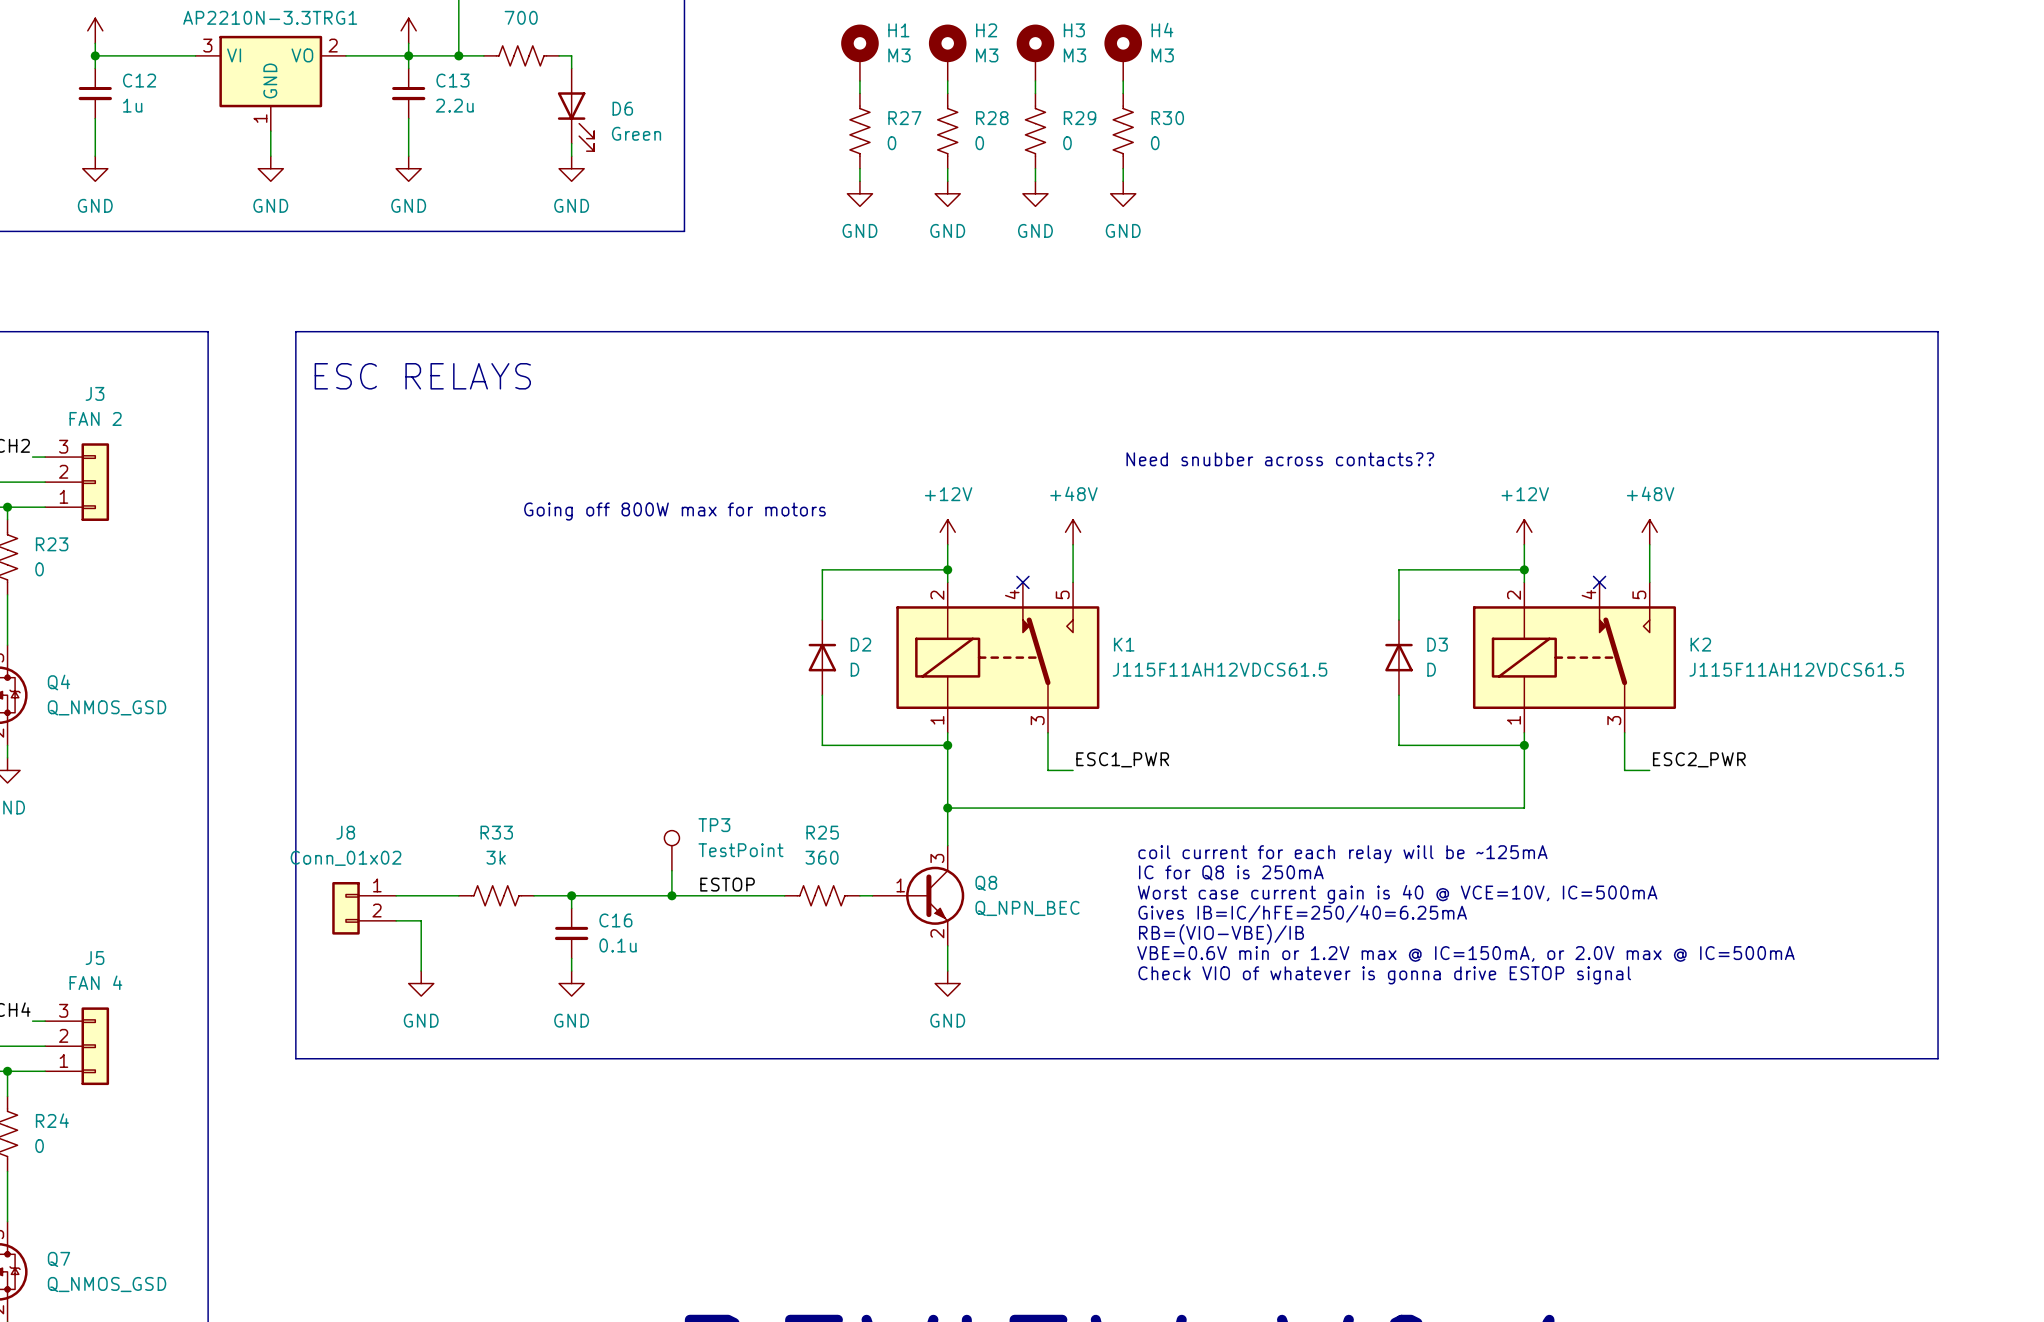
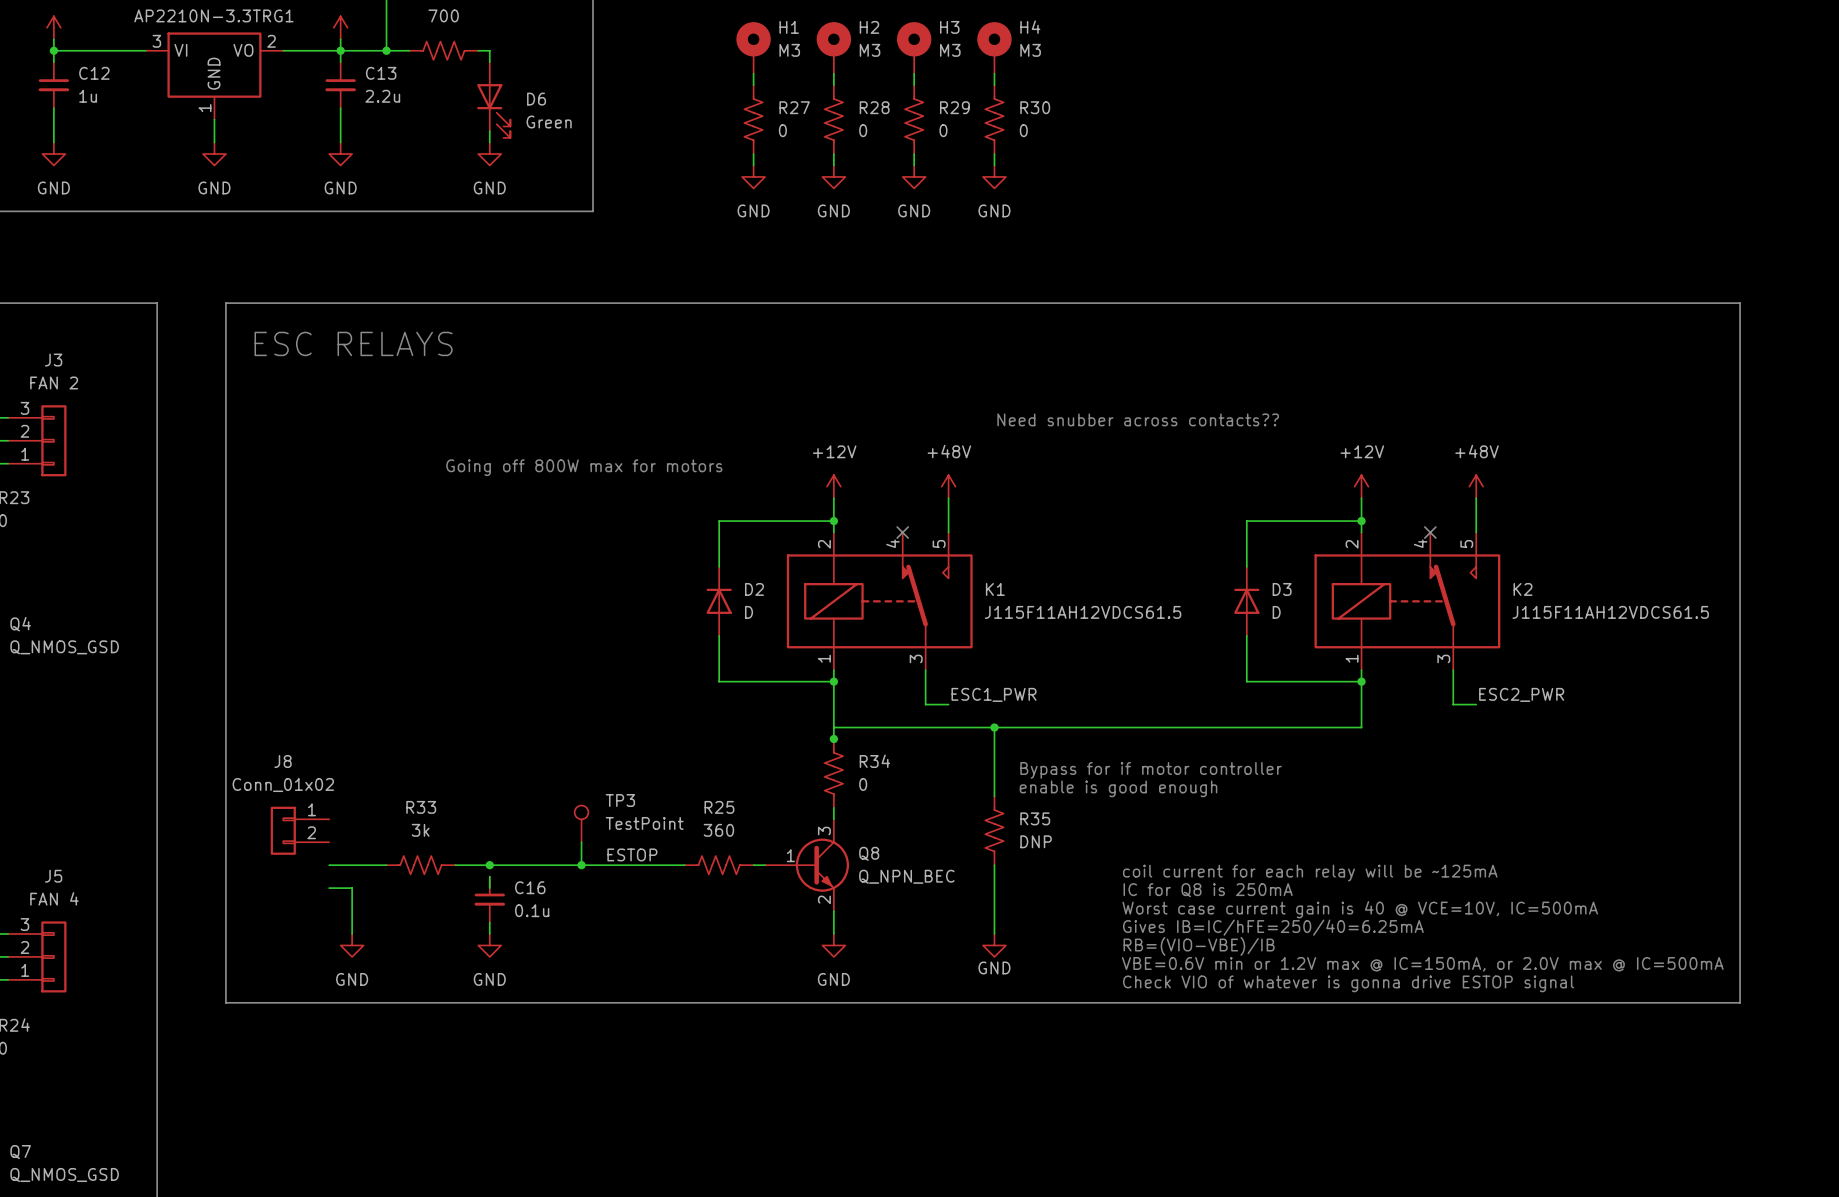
line: (295, 331) (295, 1058) (1938, 1058) -> (237, 303) (225, 303) (225, 1002) (1740, 1002) (1740, 968)
wire: none -> (994, 727) (994, 796)
junction: none -> (994, 727)
wire: (1524, 795) (1524, 808) (947, 808) (947, 845) -> (1361, 727) (833, 727)
text: none -> Bypass for if motor controller (1151, 770)
R34: none -> 0 (833, 773)
TP3 position: (671, 850) -> (581, 823)
text position: coil current for each relay will be ~125mA (1342, 854) -> coil current for each relay will be ~125mA (1310, 873)
text: none -> enable is good enough (1118, 788)
wire: (671, 870) (671, 895) -> (581, 842) (581, 865)
text position: IC for Q8 is 250mA (1231, 872) -> IC for Q8 is 250mA (1208, 890)
wire: none -> (833, 807) (833, 819)
label position: ESTOP (727, 884) -> ESTOP (632, 854)
text position: Worst case current gain is 40 @ VCE=10V, IC=500mA (1397, 894) -> Worst case current gain is 40 @ VCE=10V, IC=500mA (1360, 909)
wire: (396, 895) (458, 895) -> (329, 865) (386, 865)
R33 position: (496, 895) -> (420, 865)
wire: (534, 895) (784, 895) -> (455, 865) (684, 865)
wire: (571, 895) (571, 908) -> (489, 922) (489, 934)
junction position: (571, 895) -> (489, 865)
junction position: (671, 895) -> (581, 865)
R25 position: (822, 895) -> (719, 865)
wire: (859, 895) (872, 895) -> (753, 865) (765, 865)
Q8 position: (918, 895) -> (807, 865)
R35: none -> DNP (994, 830)
text position: Gives IB=IC/hFE=250/40=6.25mA (1302, 913) -> Gives IB=IC/hFE=250/40=6.25mA (1273, 927)
wire: (396, 920) (421, 920) (421, 971) -> (329, 888) (352, 888) (352, 934)
C16 position: (571, 933) -> (489, 899)
text position: RB=(VIO-VBE)/IB (1221, 934) -> RB=(VIO-VBE)/IB (1199, 946)
wire: (947, 945) (947, 971) -> (833, 911) (833, 934)
wire: none -> (994, 865) (994, 934)
text position: VBE=0.6V min or 1.2V max @ IC=150mA, or 2.0V max @ IC=500mA (1465, 953) -> VBE=0.6V min or 1.2V max @ IC=150mA, or 2.0V max @ IC=500mA (1422, 964)
text position: Check VIO of whatever is gonna drive ESTOP signal (1384, 975) -> Check VIO of whatever is gonna drive ESTOP signal (1348, 983)
power symbol position: GND (421, 983) -> GND (352, 945)
power symbol position: GND (571, 983) -> GND (489, 945)
power symbol position: GND (947, 983) -> GND (833, 945)
power symbol: none -> GND (994, 945)

